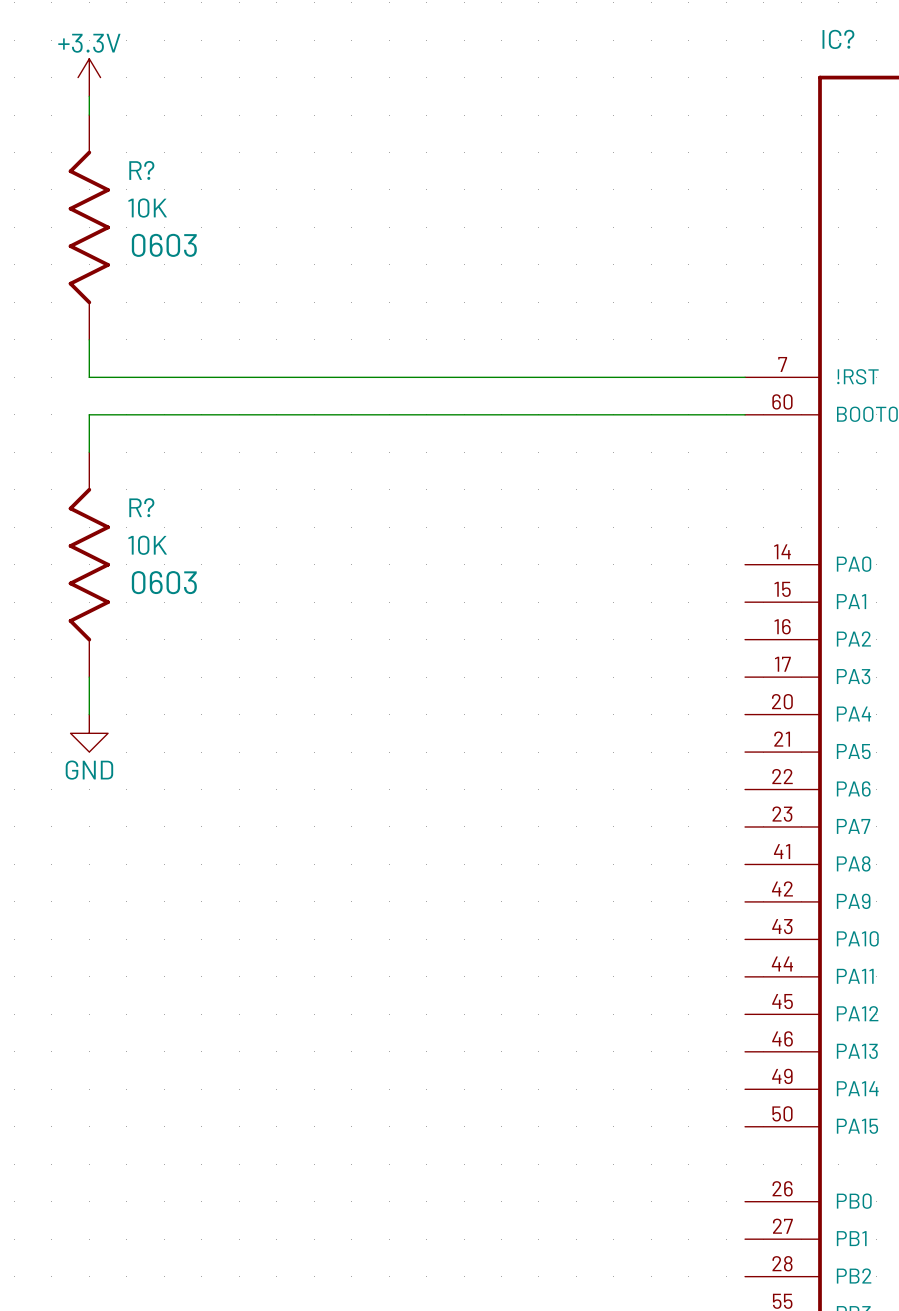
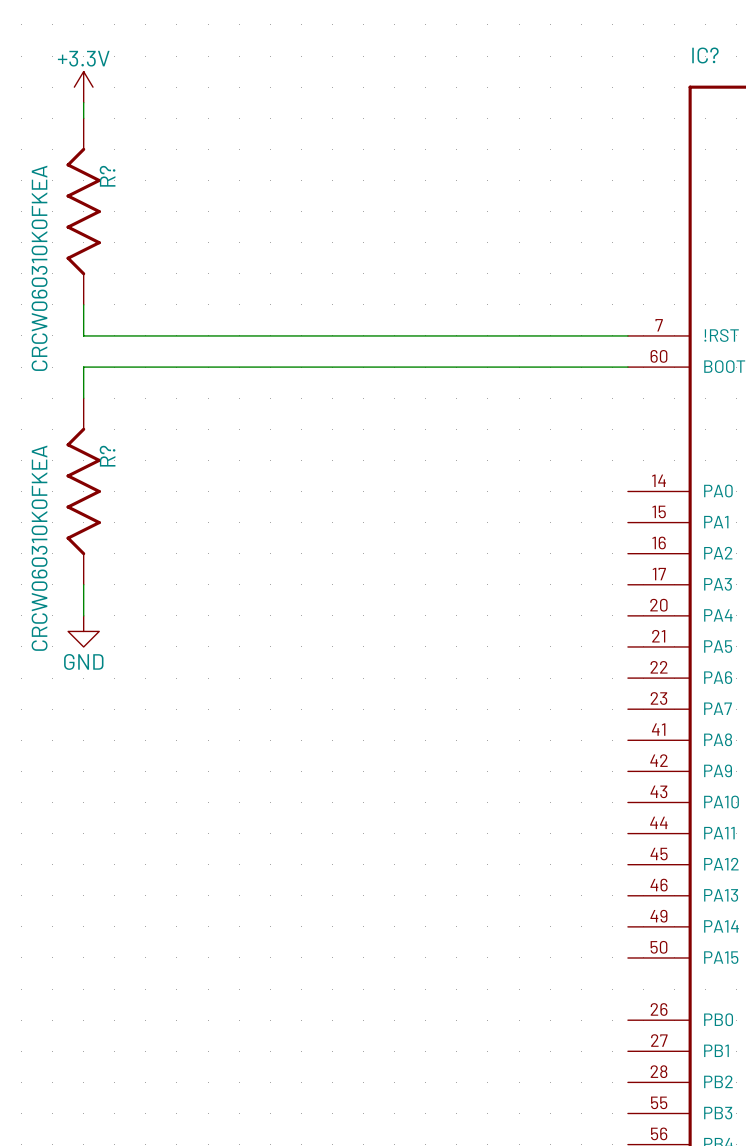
R? name rotation: 0° (141, 170) -> 90° counterclockwise (107, 176)
R? value: 10K (147, 208) -> CRCW060310K0FKEA (39, 268)
R? text: 0603 (164, 245) -> none
R? name rotation: 0° (141, 507) -> 90° counterclockwise (107, 456)
R? value: 10K (147, 545) -> CRCW060310K0FKEA (39, 548)
R? text: 0603 (164, 582) -> none

